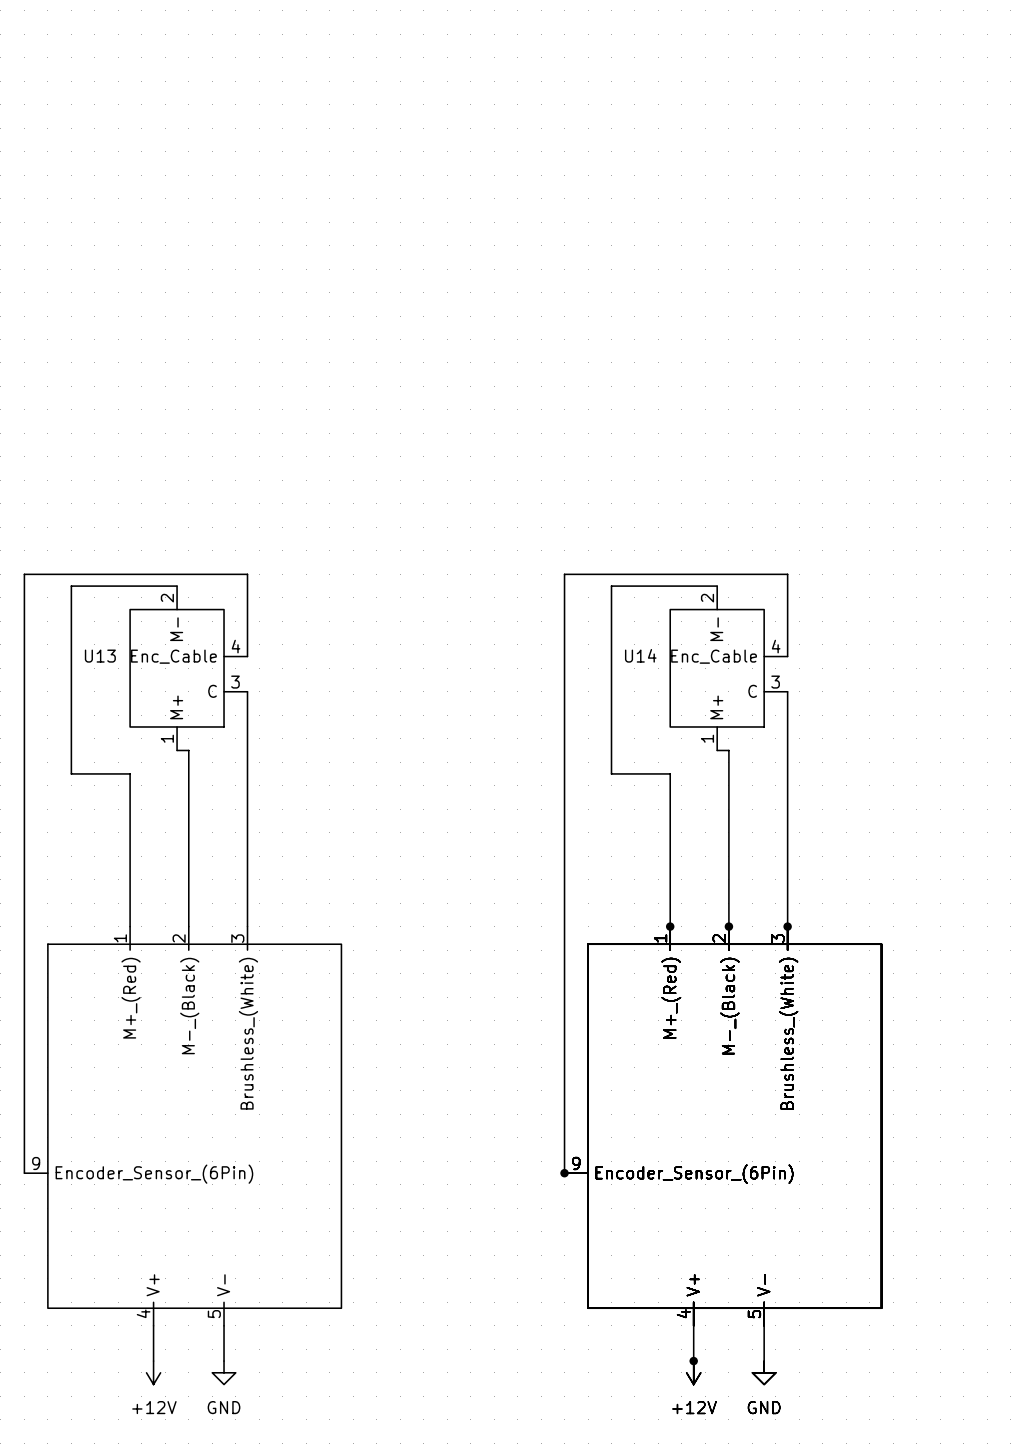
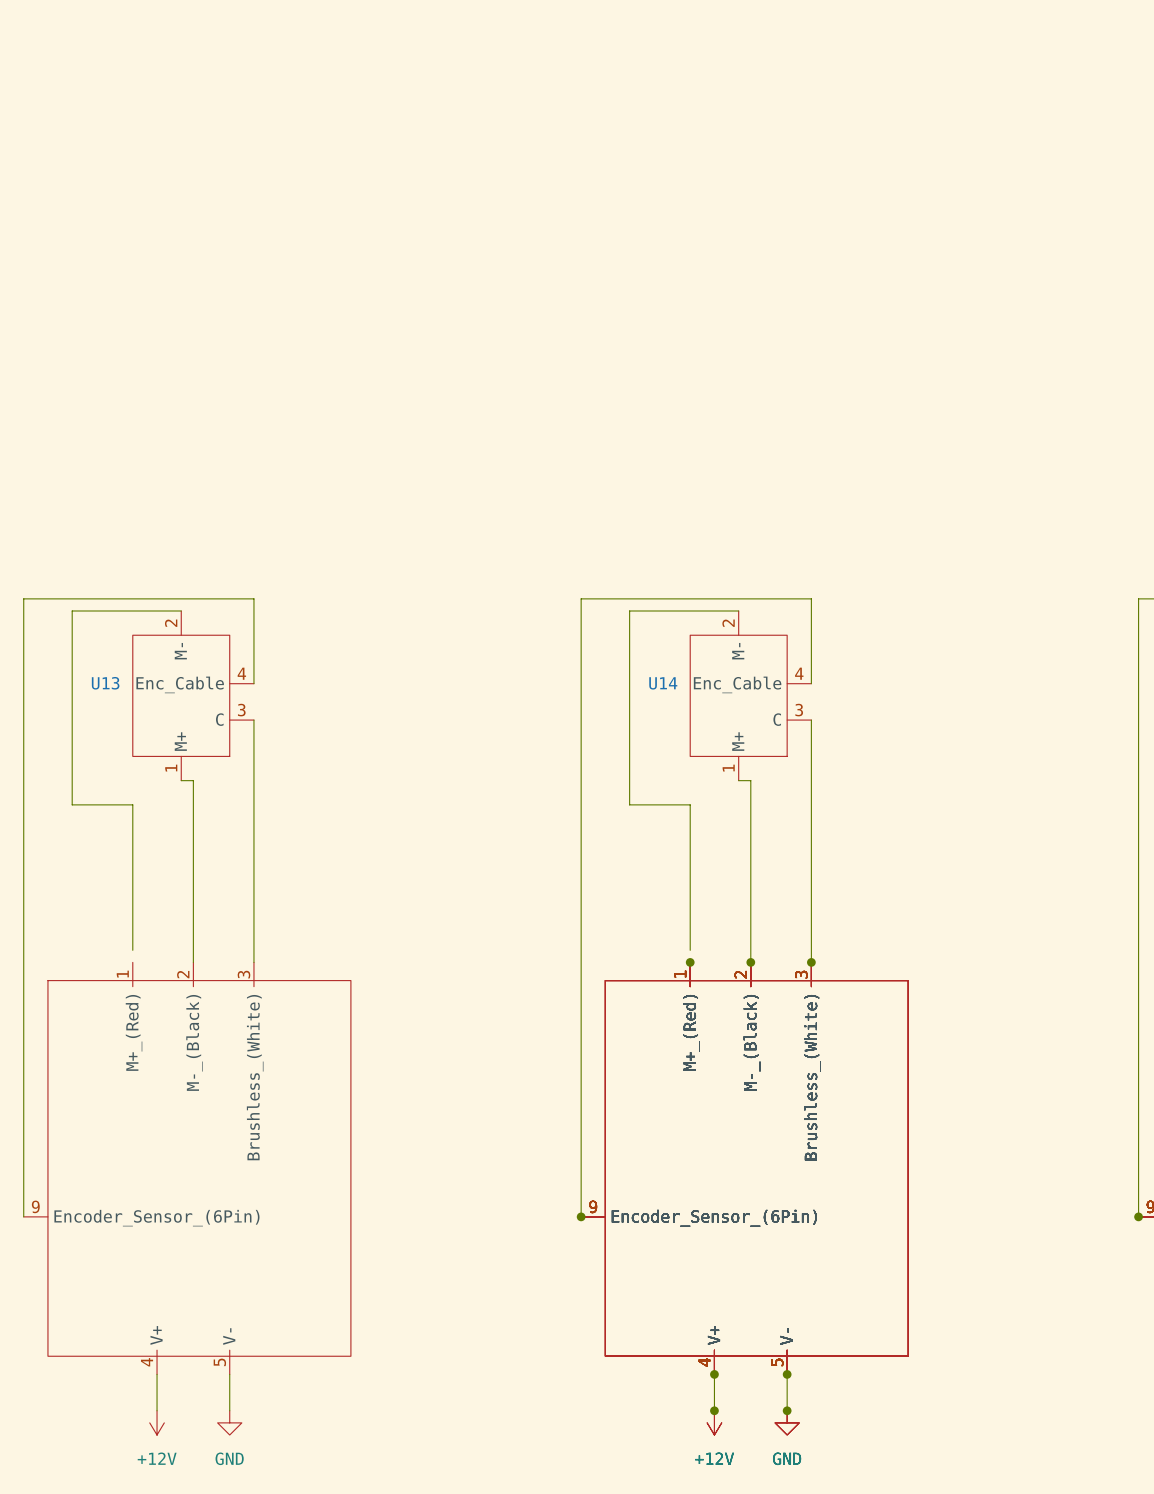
wire: (130, 914) (130, 926) -> none
wire: (670, 914) (670, 926) -> none
junction: none -> (714, 1374)
junction: none -> (787, 1374)
junction: none -> (787, 1410)

